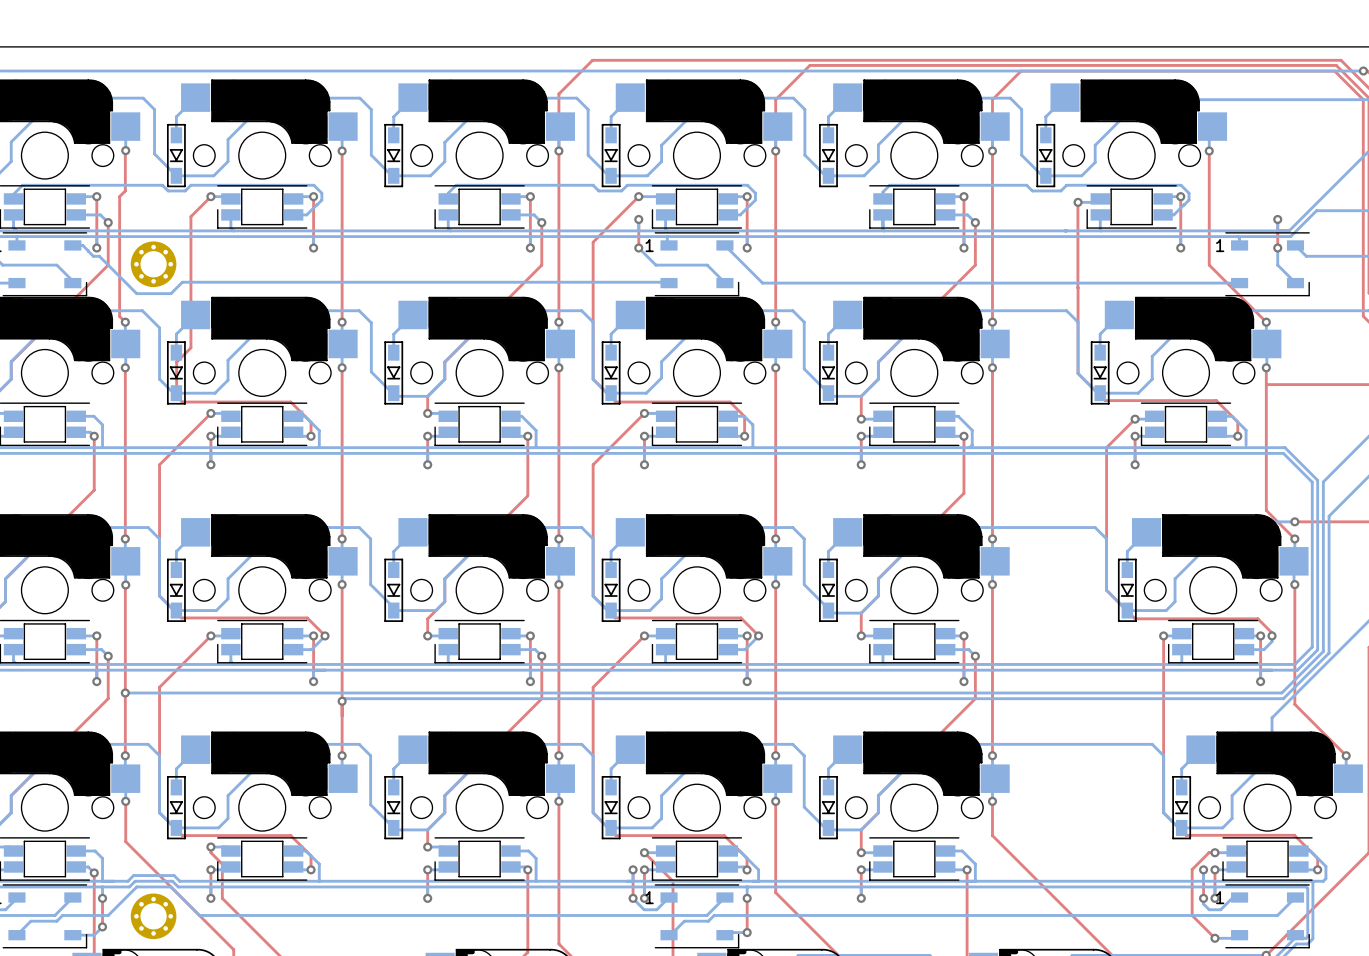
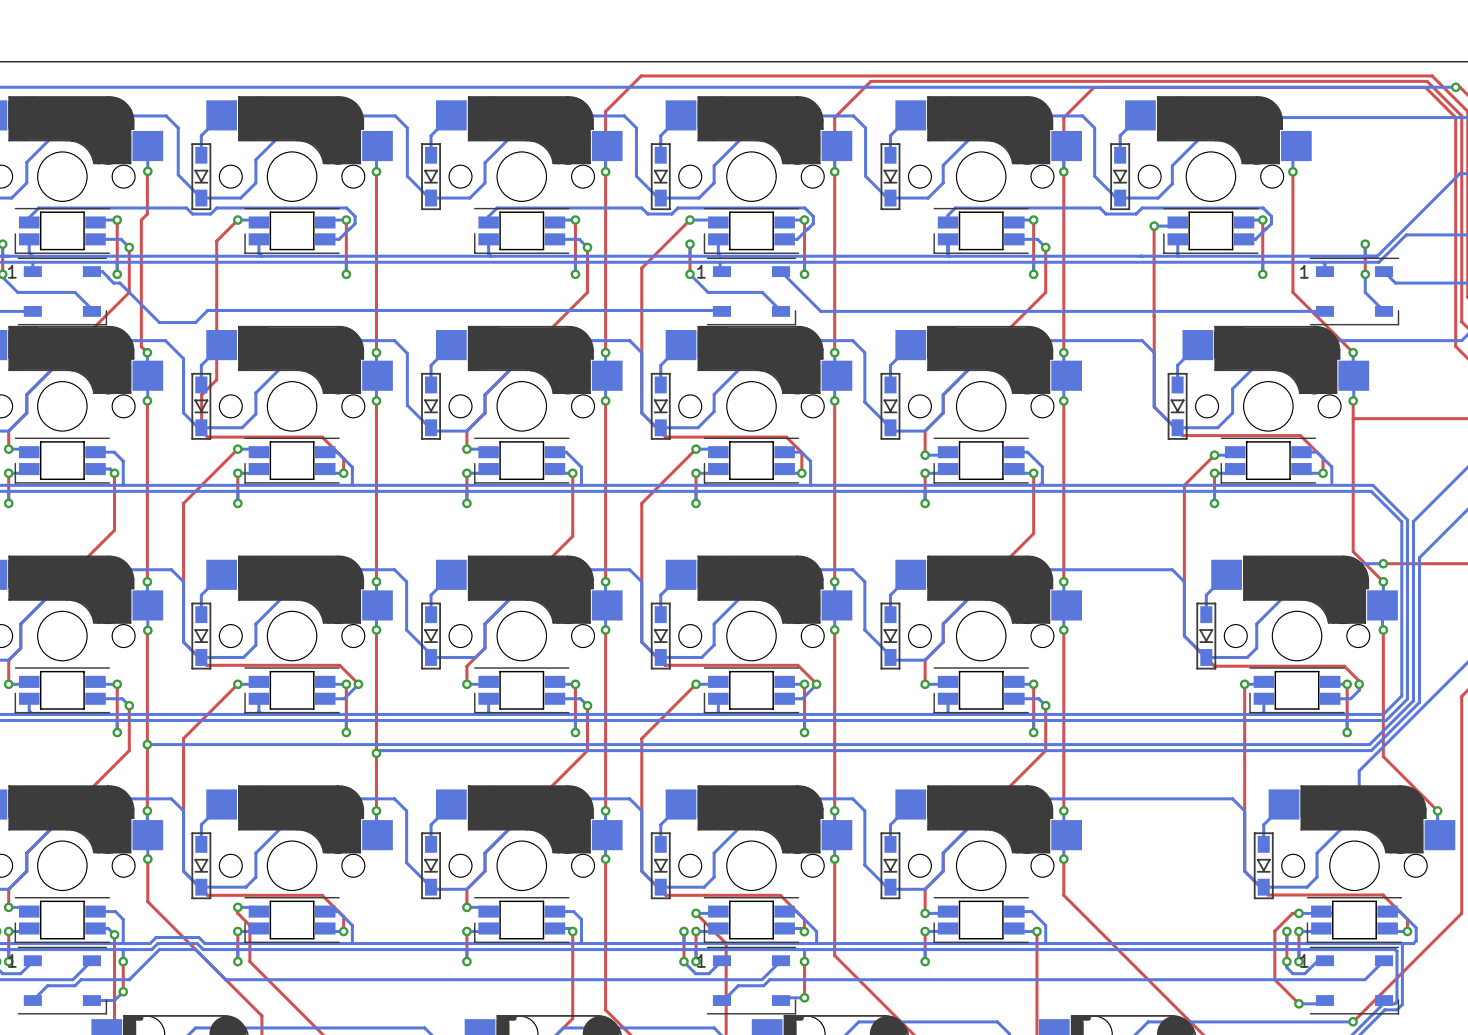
part: (153, 264) -> none
part: (153, 916) -> none

